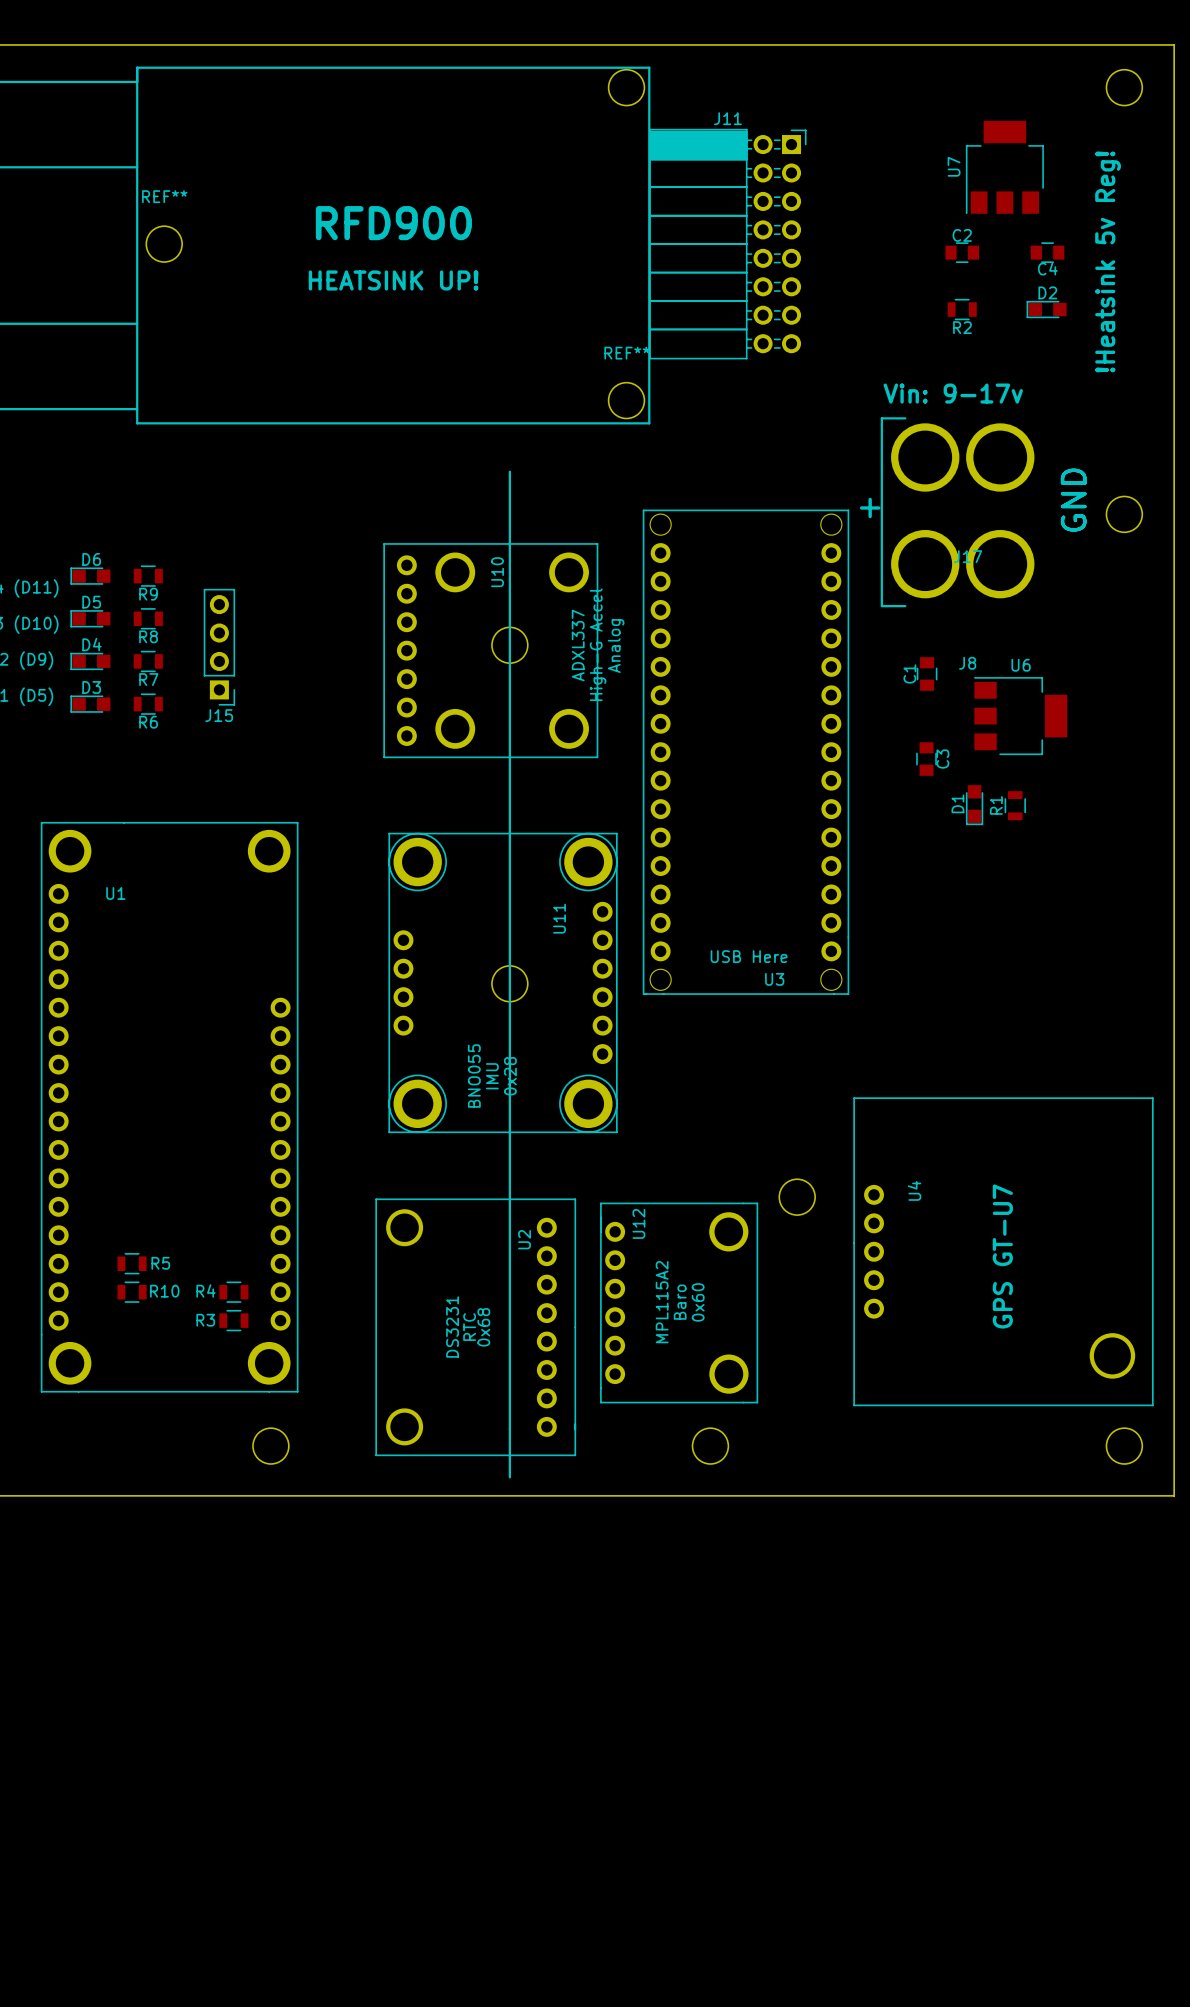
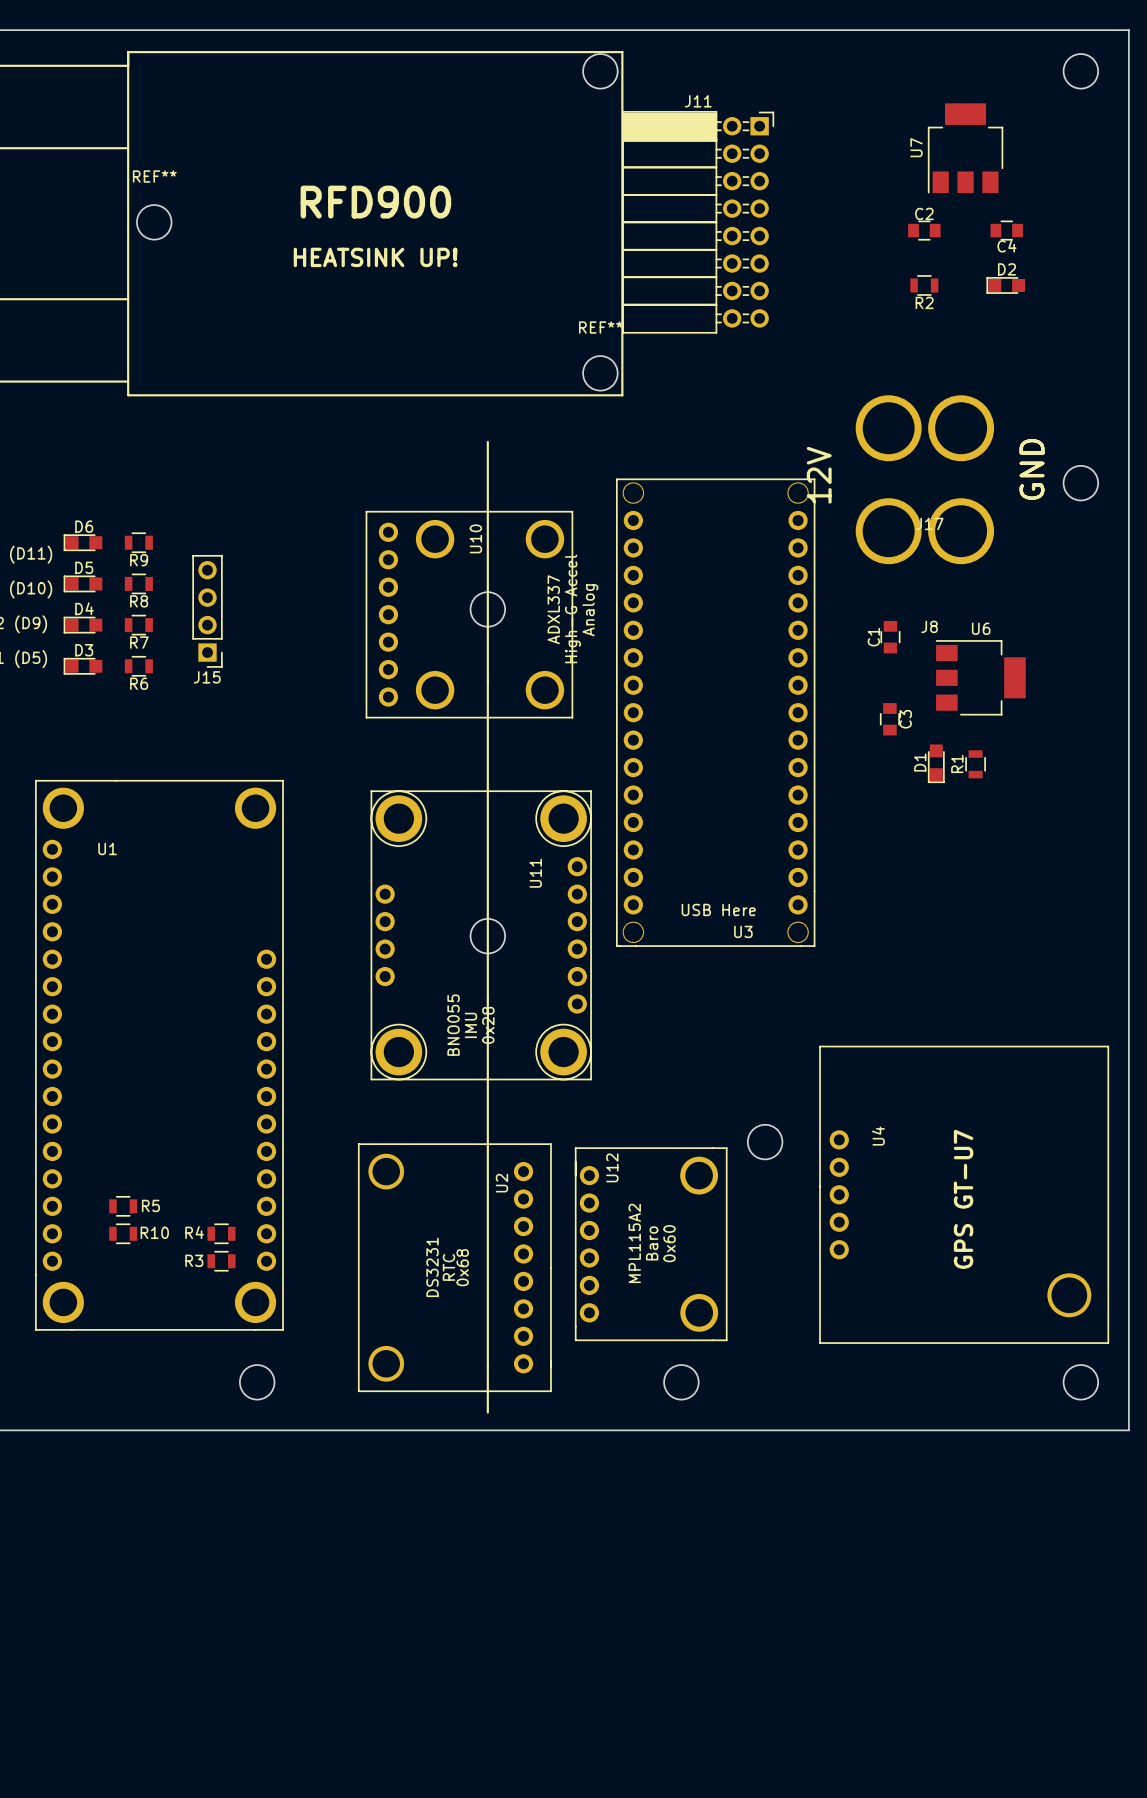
text: !Heatsink 5v Reg! (1108, 261) -> none
text: Vin: 9-17v (953, 393) -> none
line: (905, 418) (881, 418) (881, 606) (905, 606) -> none
text: none -> 12V (819, 475)
text: + (870, 507) -> none

